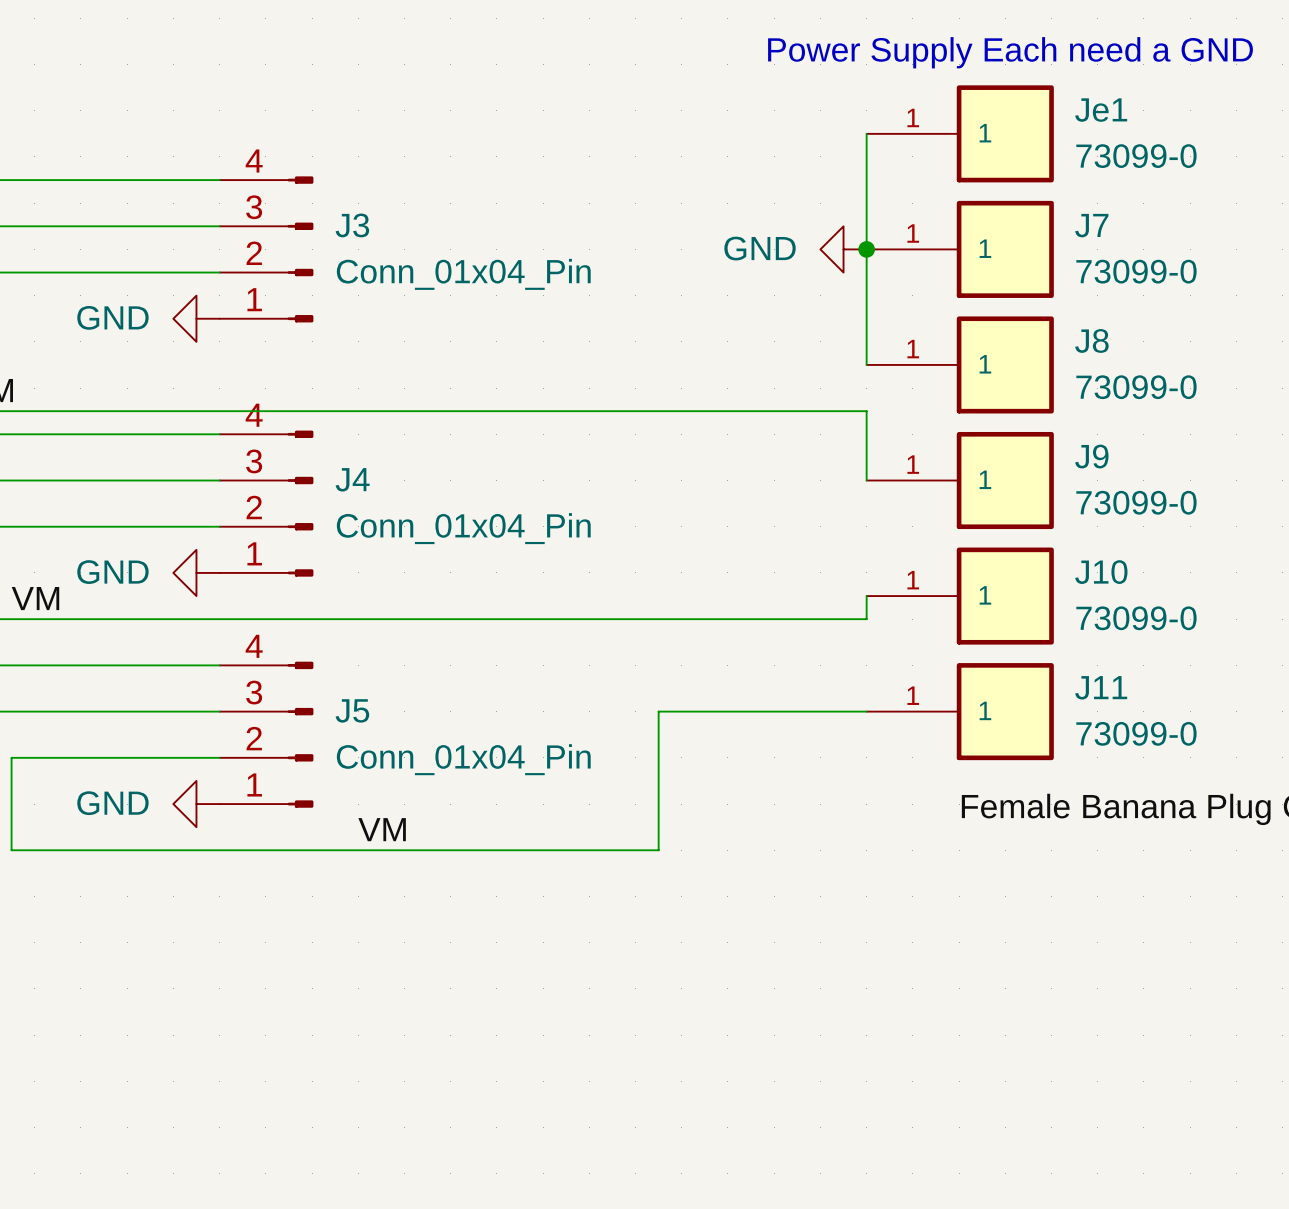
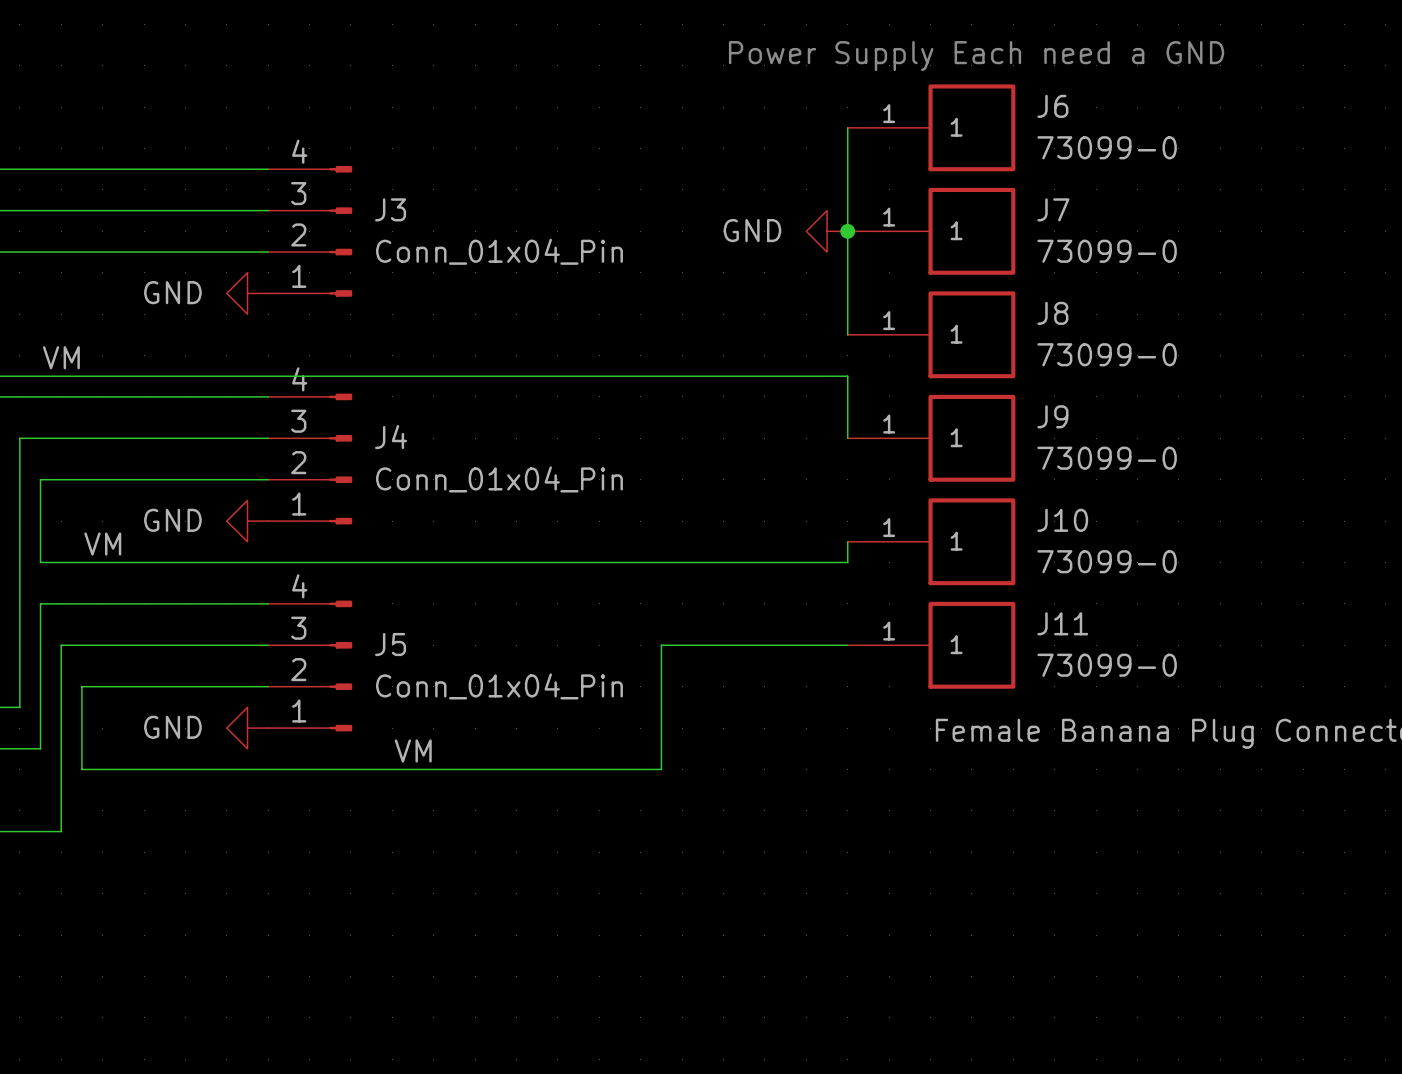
Je1 name: Je1 (1101, 110) -> J6 (1052, 106)

